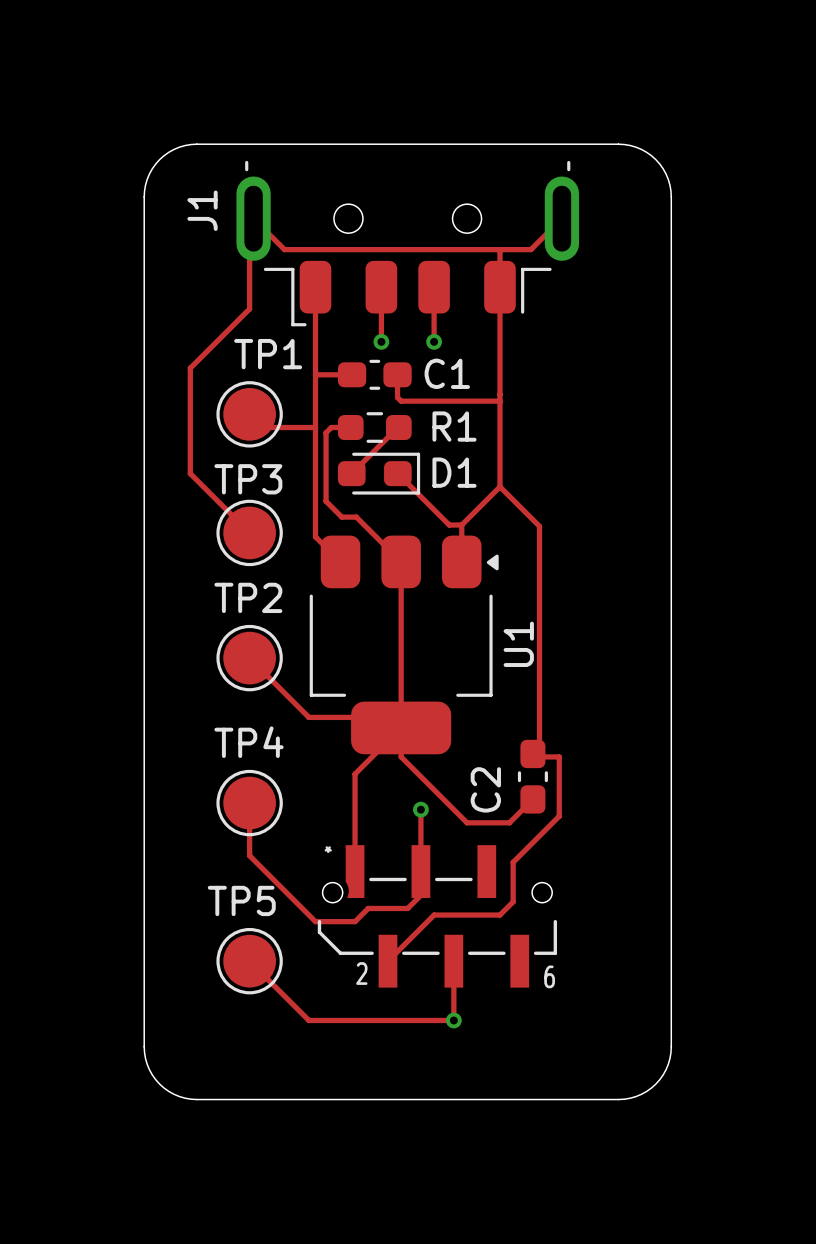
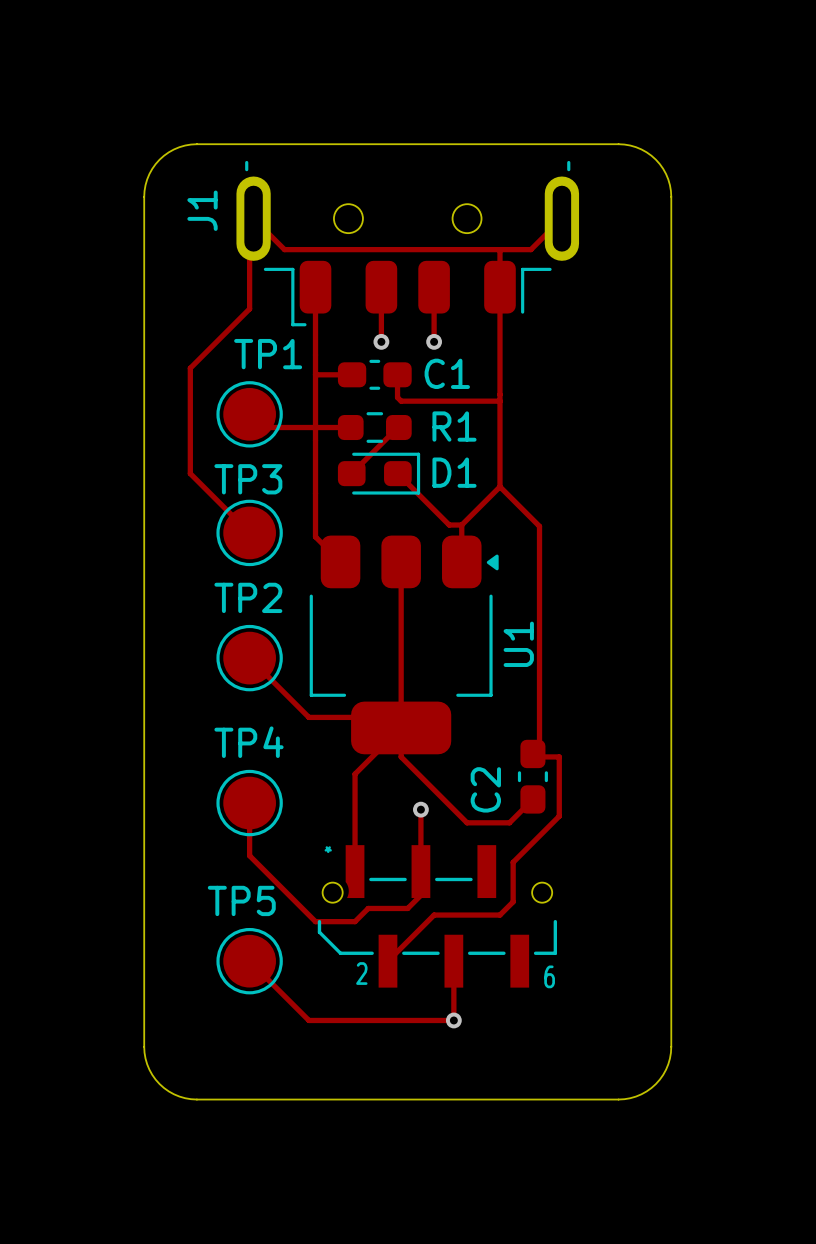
track: (331, 427) (326, 432) (326, 501) (341, 517) (356, 517) (401, 561) -> (331, 427) (315, 427)

